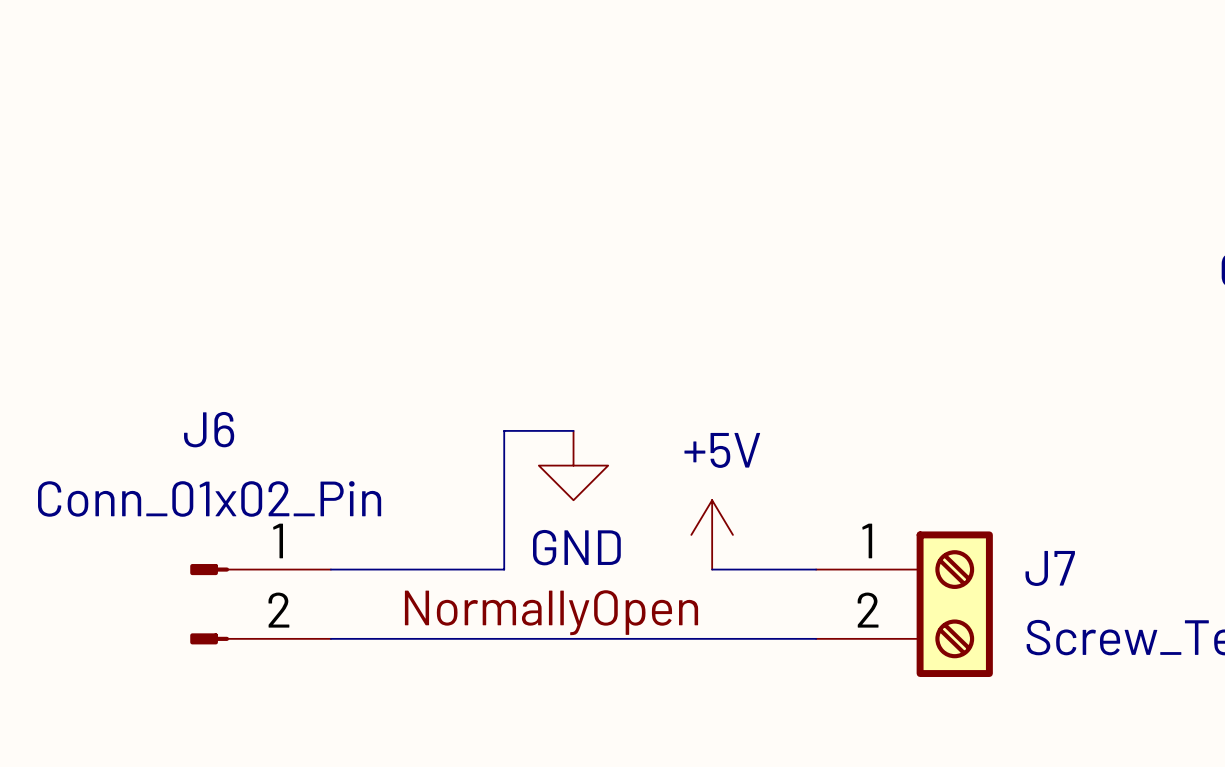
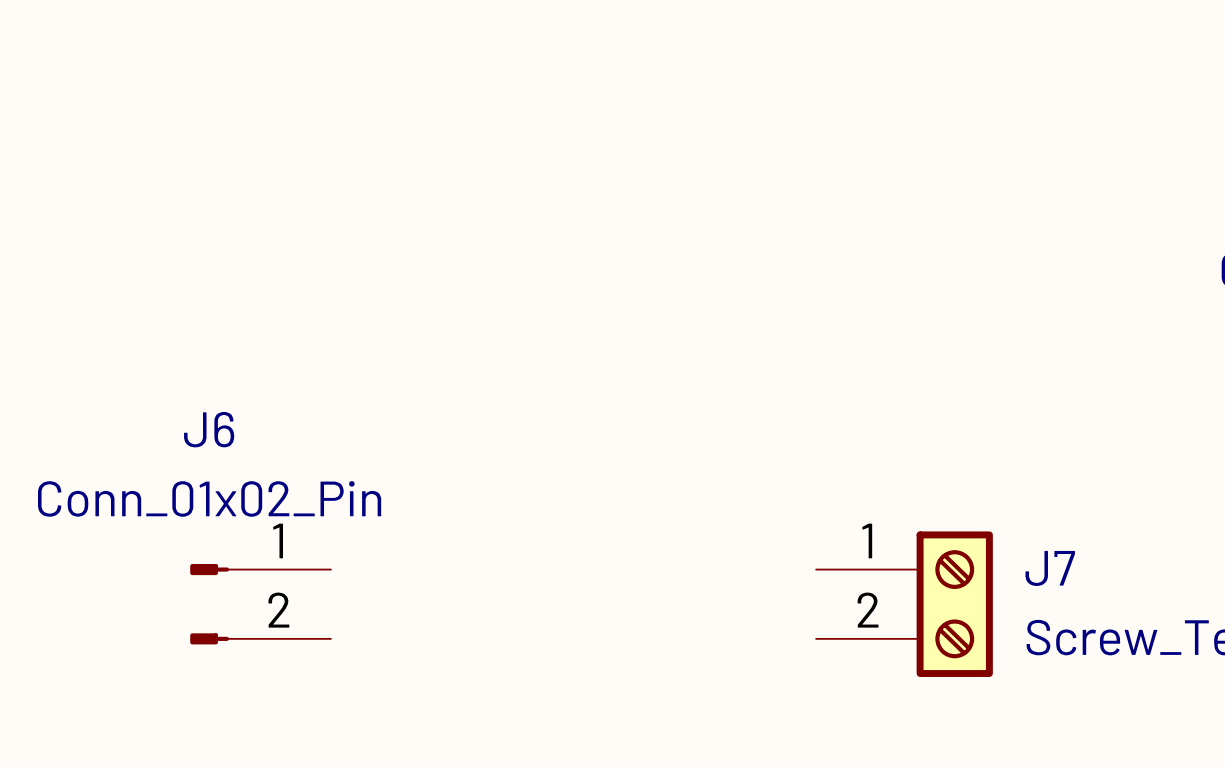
wire: (573, 430) (504, 430) (504, 569) (330, 569) -> none
power symbol: GND (573, 465) -> none
power symbol: +5V (712, 534) -> none
wire: (712, 569) (816, 569) -> none
label: NormallyOpen (551, 612) -> none
wire: (330, 638) (816, 638) -> none

